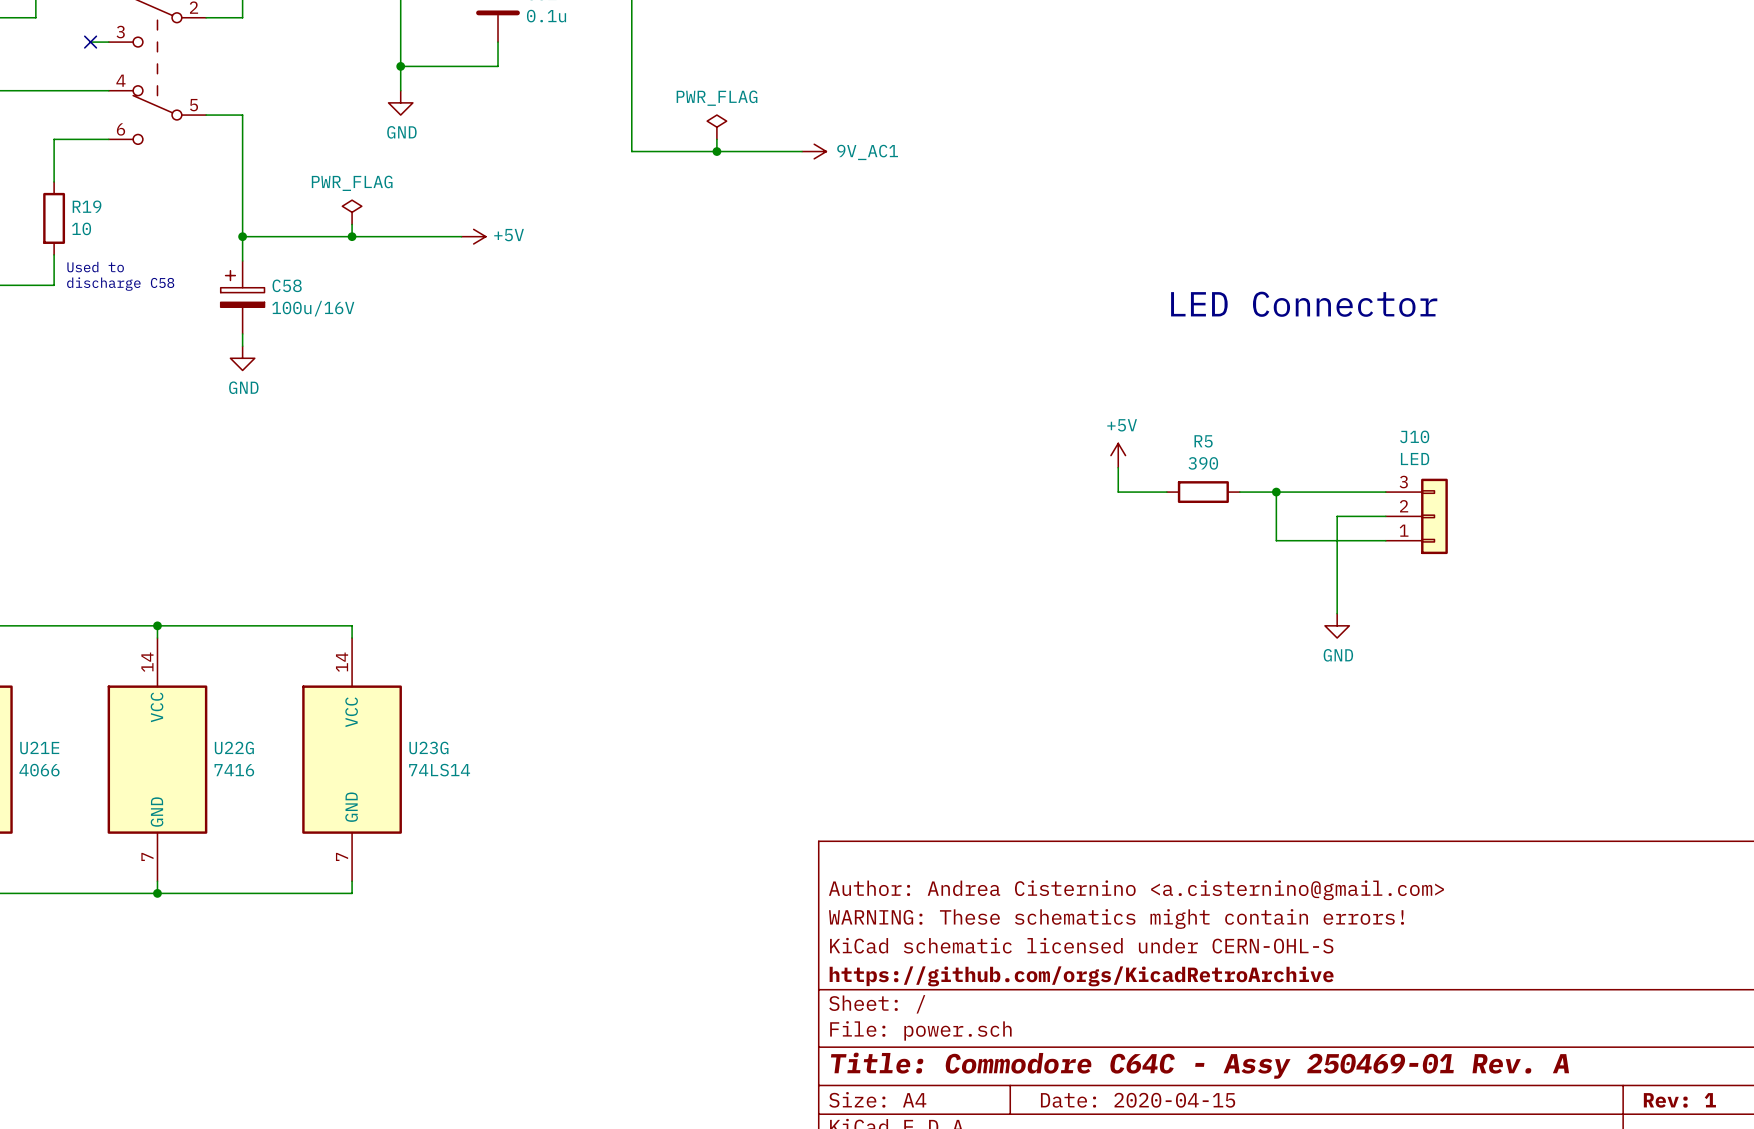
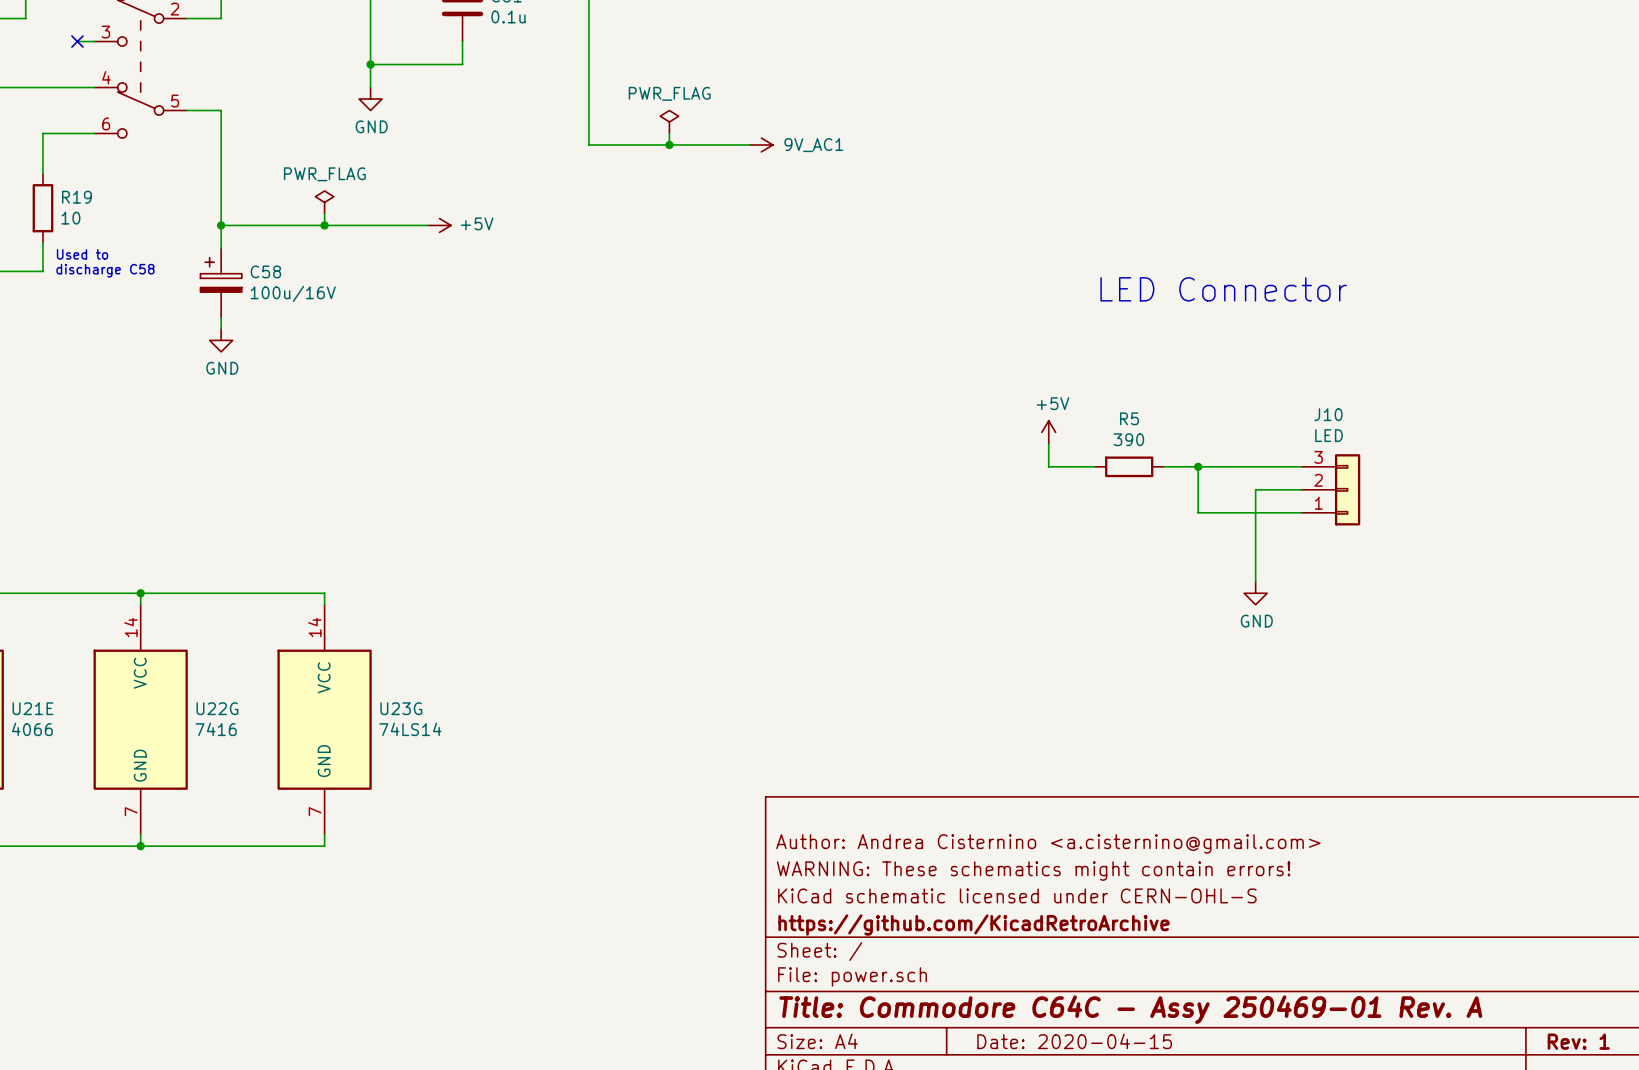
title block: https://github.com/orgs/KicadRetroArchive (1081, 976) -> https://github.com/KicadRetroArchive (973, 925)

